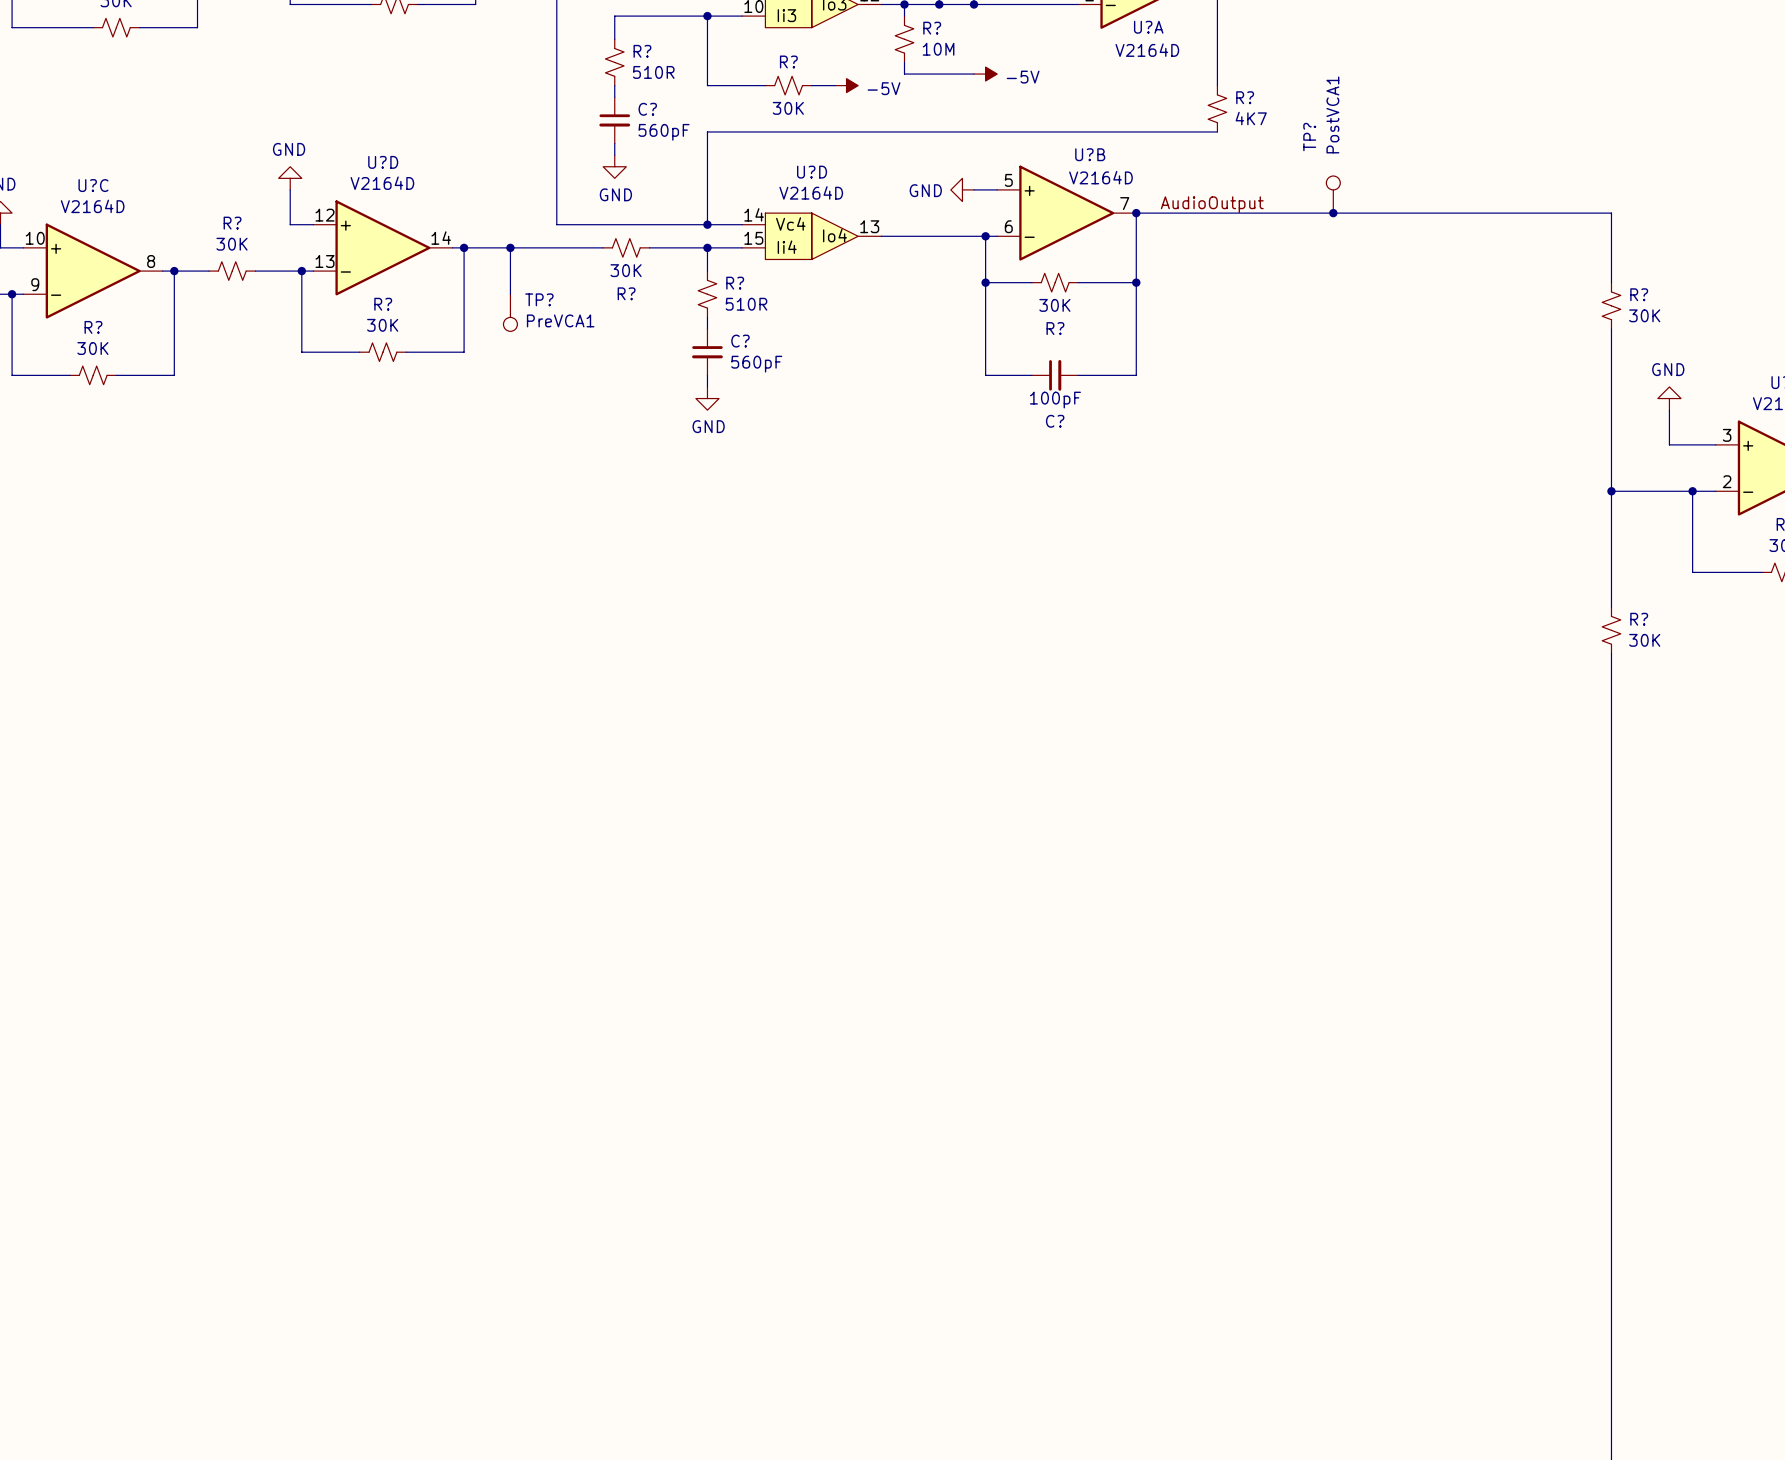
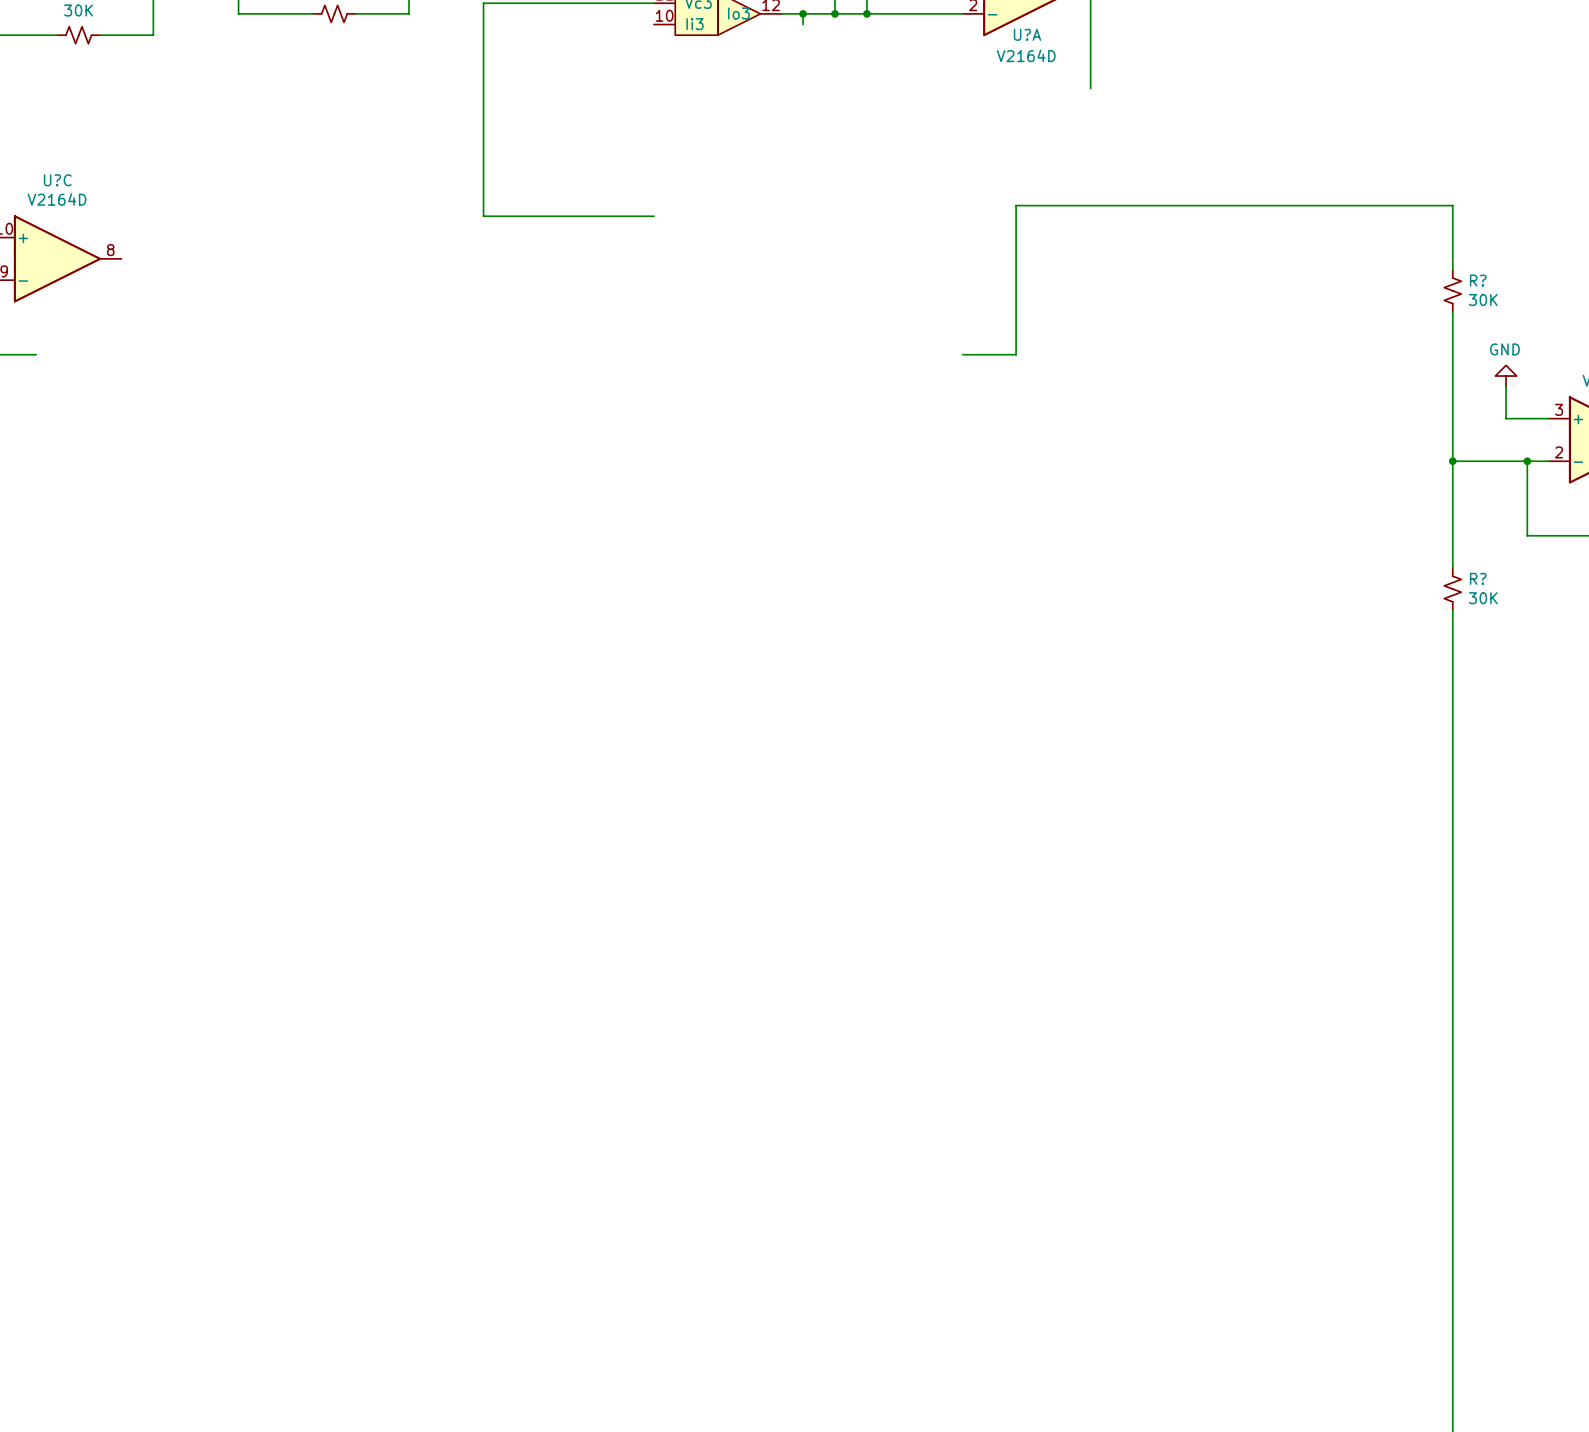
wire: (707, 16) (707, 85) (765, 85) -> none
junction: (707, 16) -> none
wire: (742, 16) (614, 16) (614, 39) -> none
R?: 10M (904, 39) -> none
R?: 510R (614, 62) -> none
wire: (904, 62) (904, 74) (974, 74) -> none
power symbol: -5V (985, 74) -> none
wire: (614, 85) (614, 97) -> none
R?: 30K (788, 85) -> none
wire: (811, 85) (834, 85) -> none
power symbol: -5V (846, 85) -> none
R?: 4K7 (1217, 108) -> none
C?: 560pF (614, 120) -> none
wire: (1217, 131) (707, 131) (707, 224) -> none
wire: (614, 143) (614, 155) -> none
power symbol: GND (614, 166) -> none
power symbol: GND (290, 178) -> none
wire: (290, 189) (290, 224) (313, 224) -> none
power symbol: GND (962, 189) -> none
wire: (974, 189) (997, 189) -> none
TP?: PostVCA1 (1333, 194) -> none
label: AudioOutput (1212, 204) -> none
U?B: V2164D (1066, 213) -> none
junction: (1136, 213) -> none
junction: (1333, 213) -> none
junction: (707, 224) -> none
U?D: V2164D (811, 236) -> none
wire: (881, 236) (997, 236) -> none
wire: (985, 236) (985, 375) (1031, 375) -> none
junction: (985, 236) -> none
U?D: V2164D (382, 247) -> none
wire: (452, 247) (603, 247) -> none
wire: (464, 247) (464, 352) (406, 352) -> none
junction: (464, 247) -> none
wire: (510, 247) (510, 294) -> none
junction: (510, 247) -> none
R?: 30K (626, 247) -> none
wire: (649, 247) (742, 247) -> none
wire: (707, 247) (707, 271) -> none
junction: (707, 247) -> none
wire: (162, 271) (209, 271) -> none
wire: (174, 271) (174, 375) (116, 375) -> none
junction: (174, 271) -> none
R?: 30K (232, 271) -> none
wire: (255, 271) (313, 271) -> none
wire: (301, 271) (301, 352) (359, 352) -> none
junction: (301, 271) -> none
wire: (985, 282) (1031, 282) -> none
junction: (985, 282) -> none
R?: 30K (1055, 282) -> none
wire: (1078, 282) (1136, 282) -> none
junction: (1136, 282) -> none
R?: 510R (707, 294) -> none
TP?: PreVCA1 (510, 312) -> none
wire: (707, 317) (707, 329) -> none
R?: 30K (382, 352) -> none
C?: 560pF (707, 352) -> none
R?: 30K (93, 375) -> none
wire: (707, 375) (707, 386) -> none
C?: 100pF (1055, 375) -> none
power symbol: GND (707, 398) -> none

